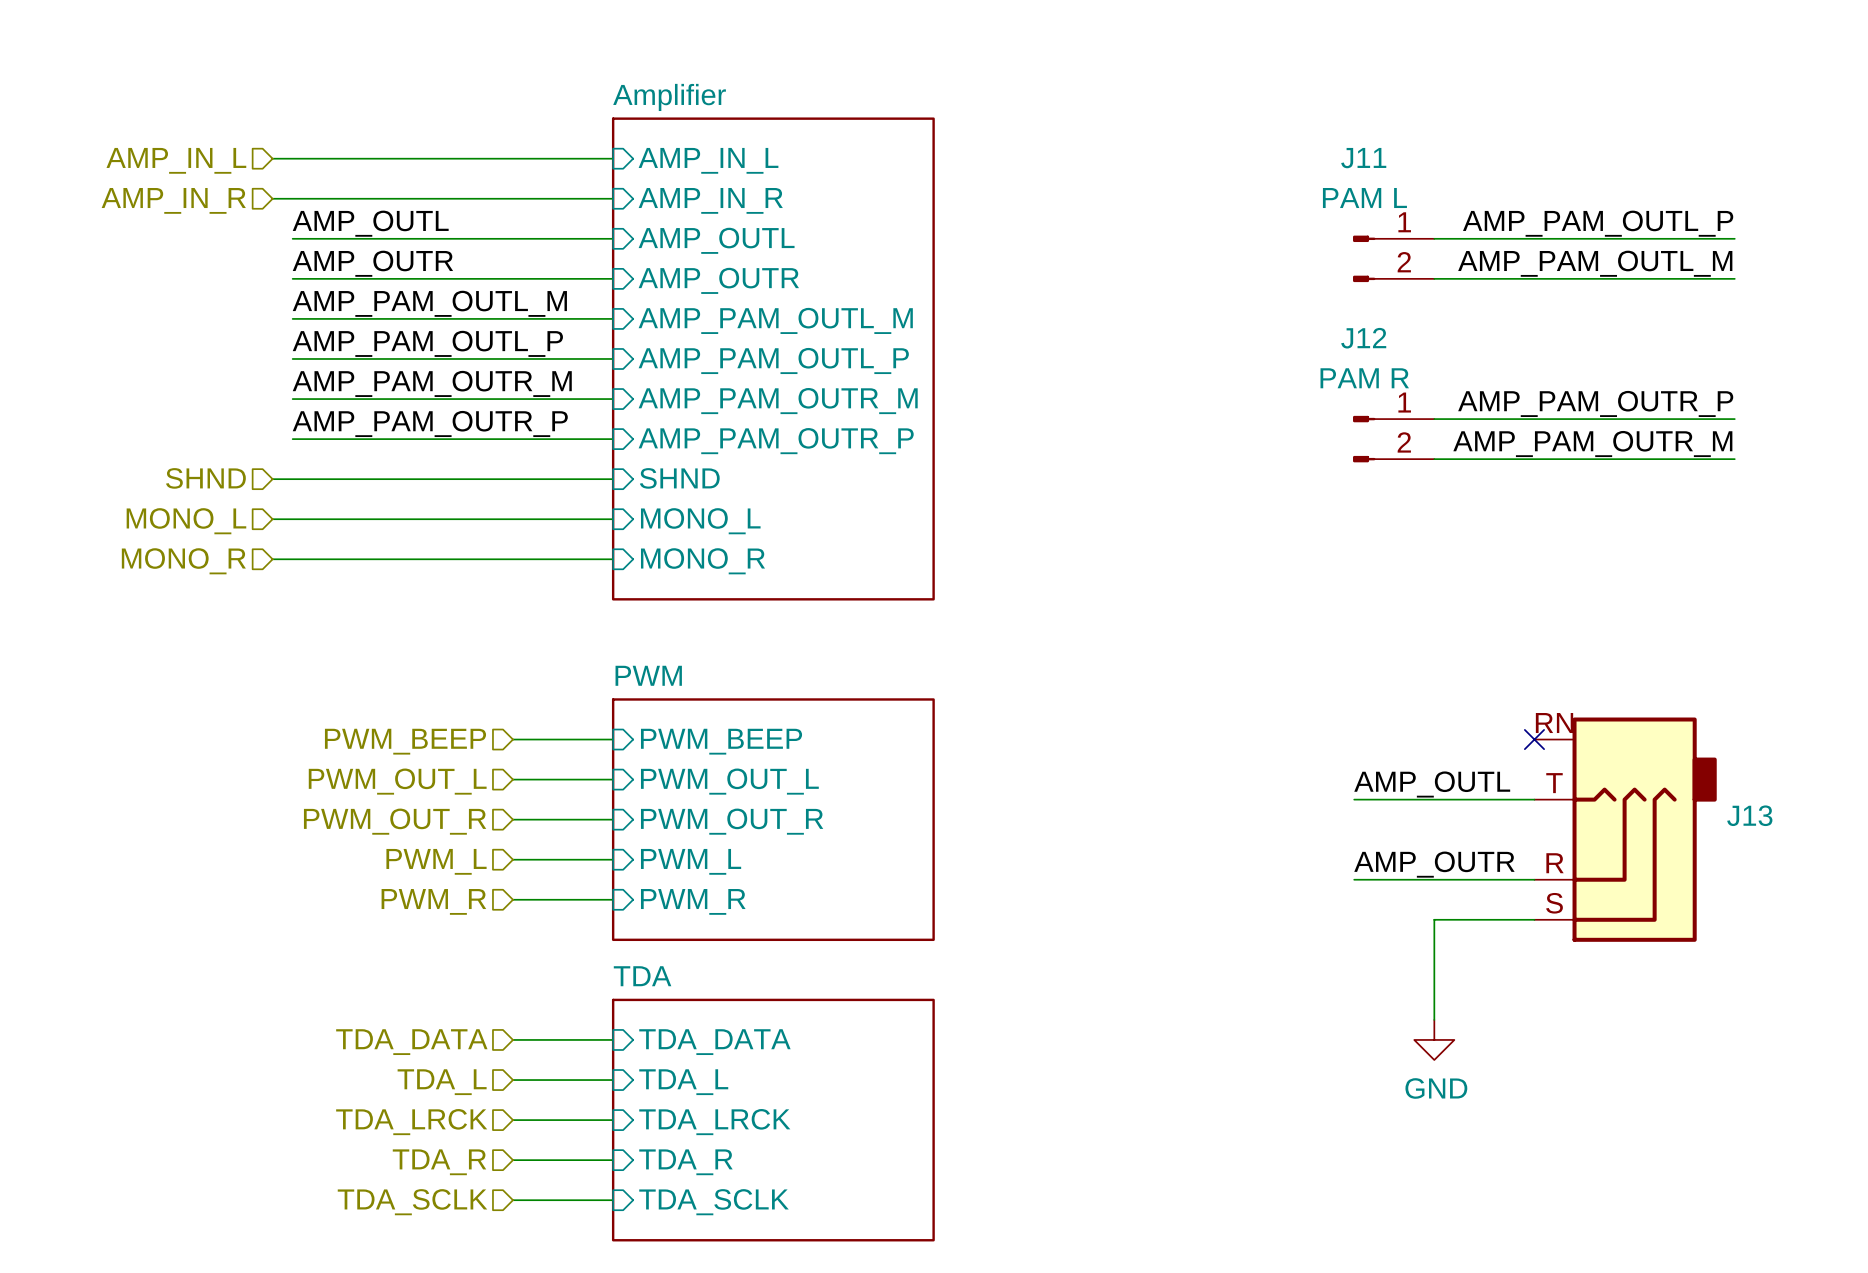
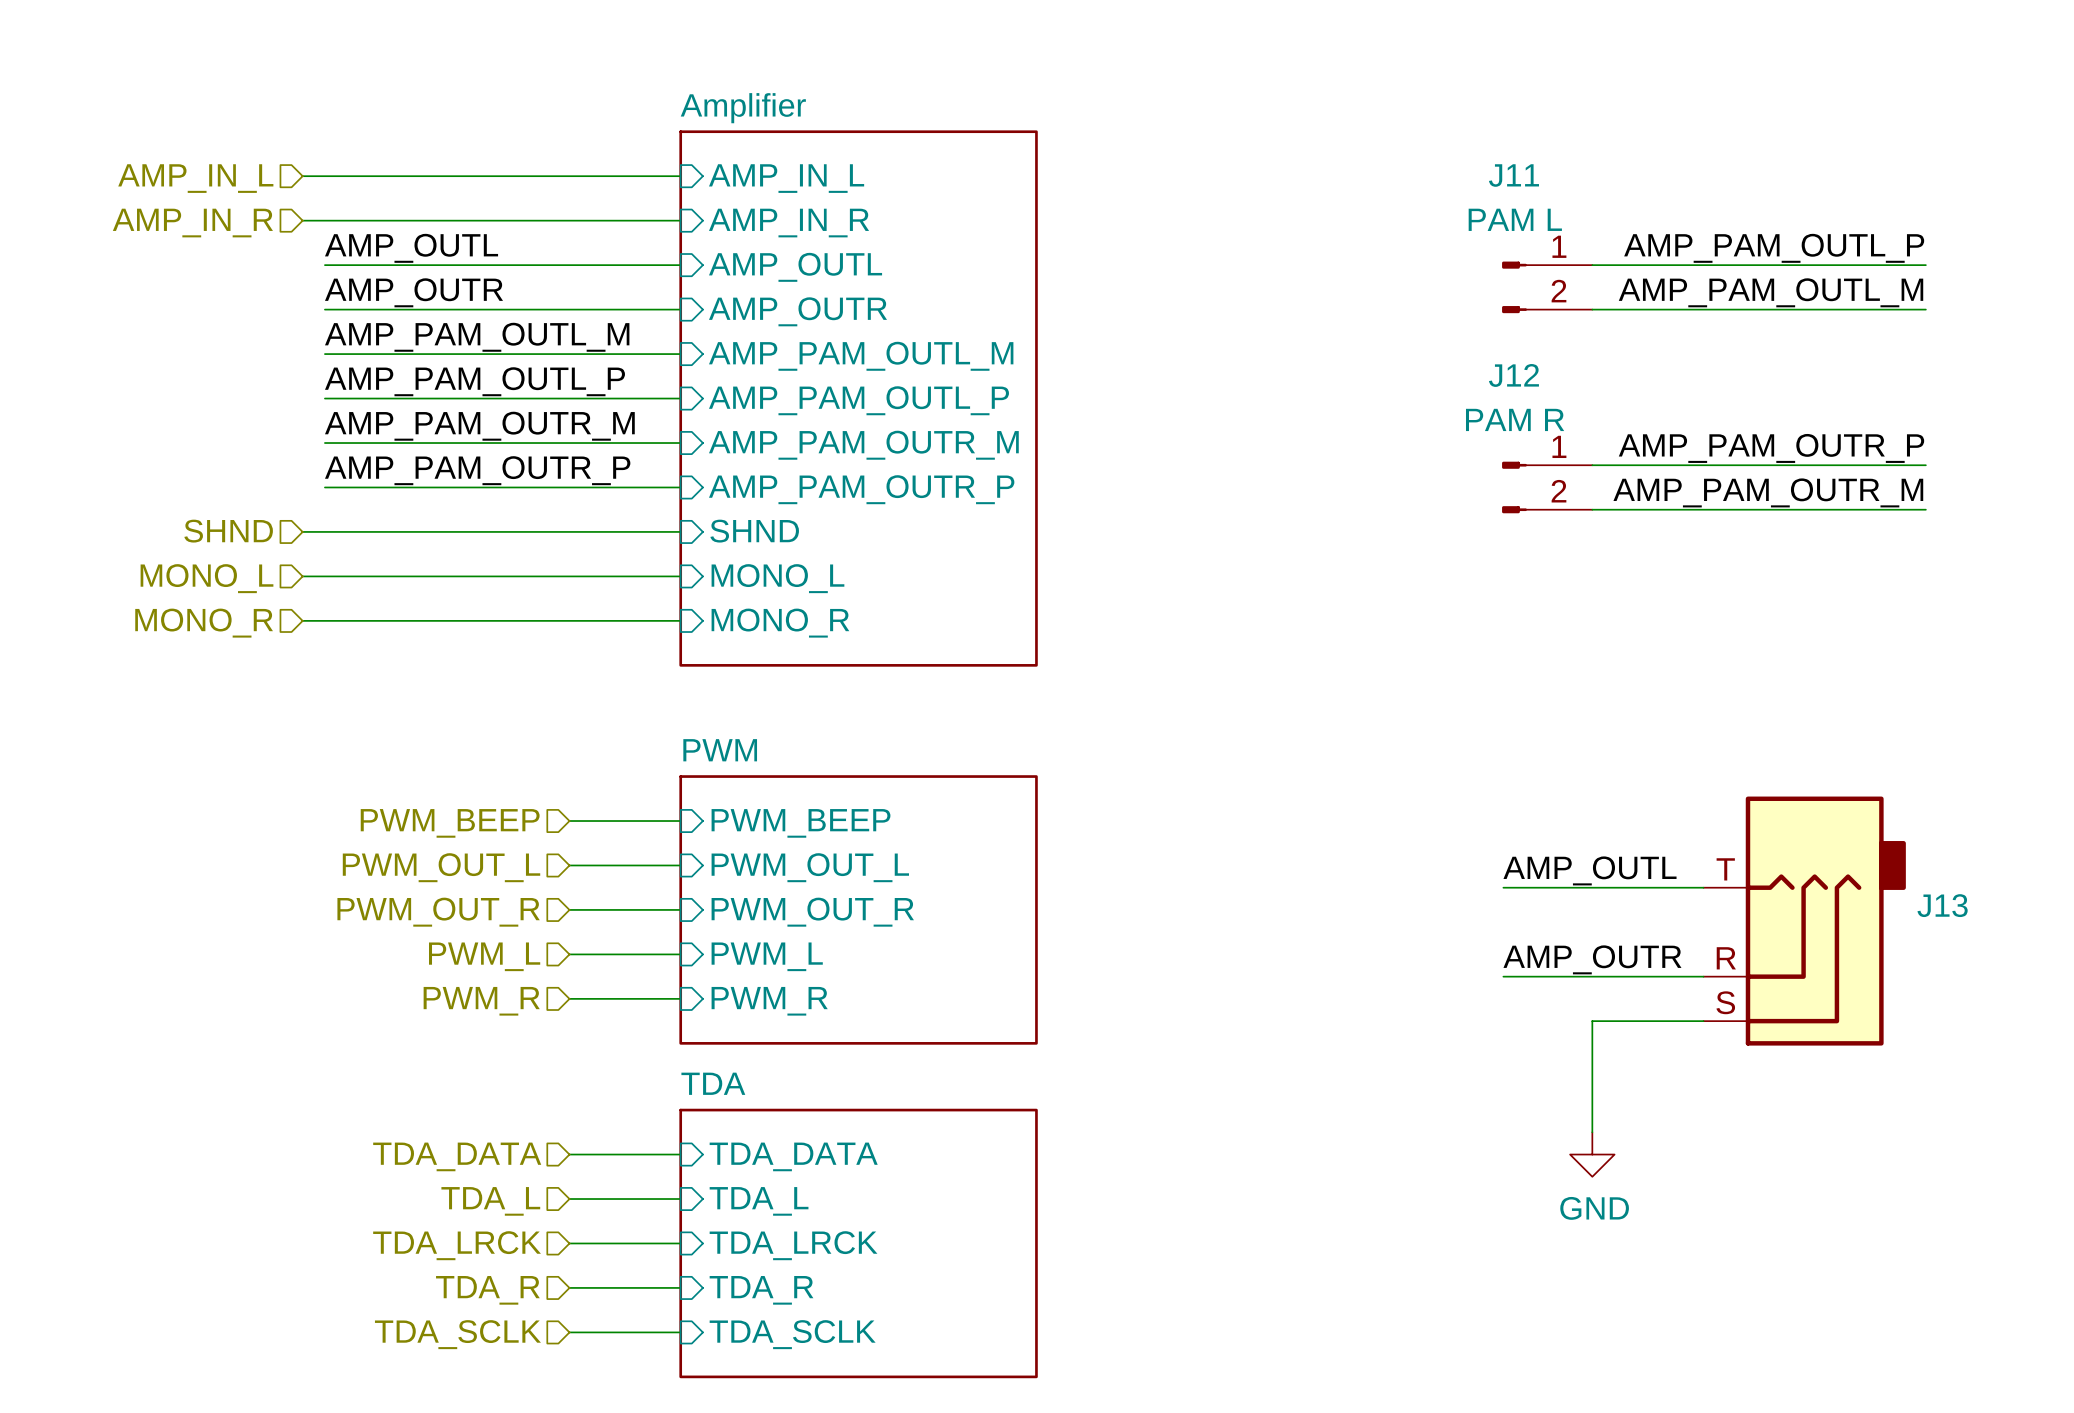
J13 symbol: [1534, 717, 1717, 942] -> [1703, 796, 1906, 1046]
no-connect mark: (1534, 739) -> none

